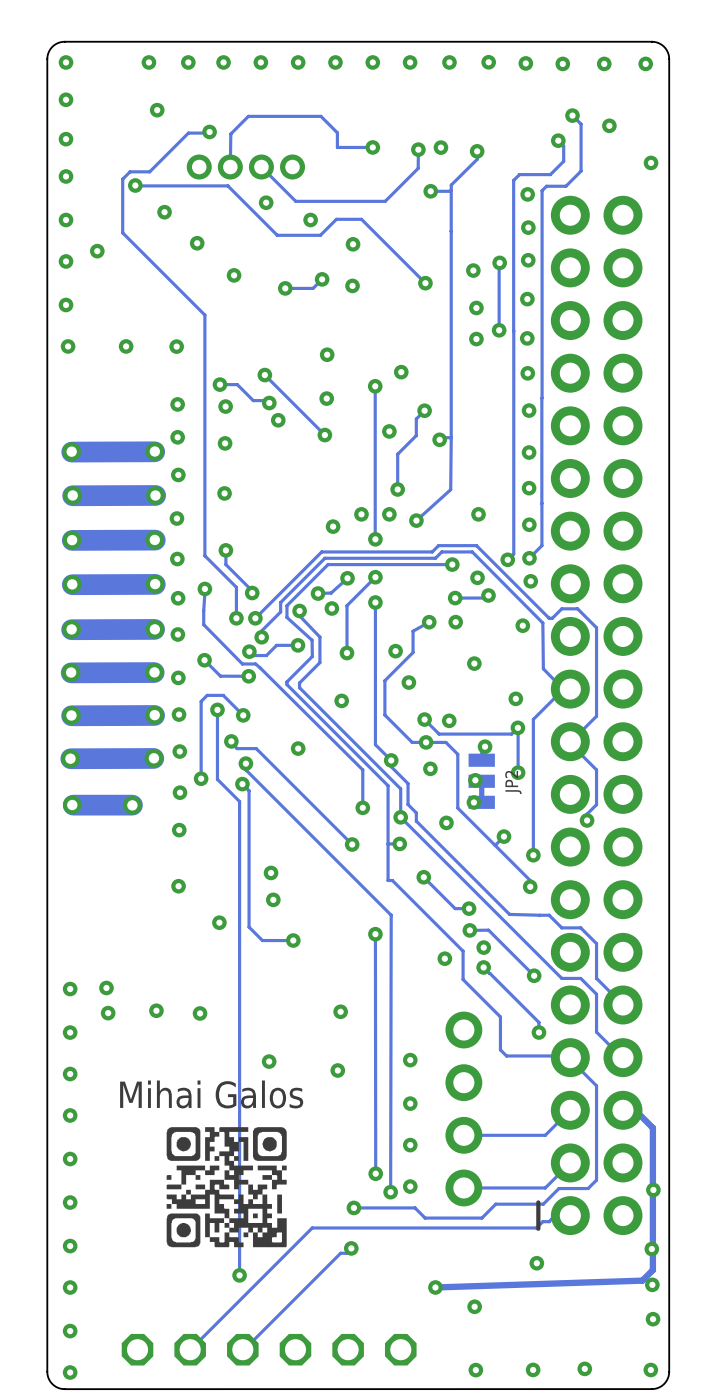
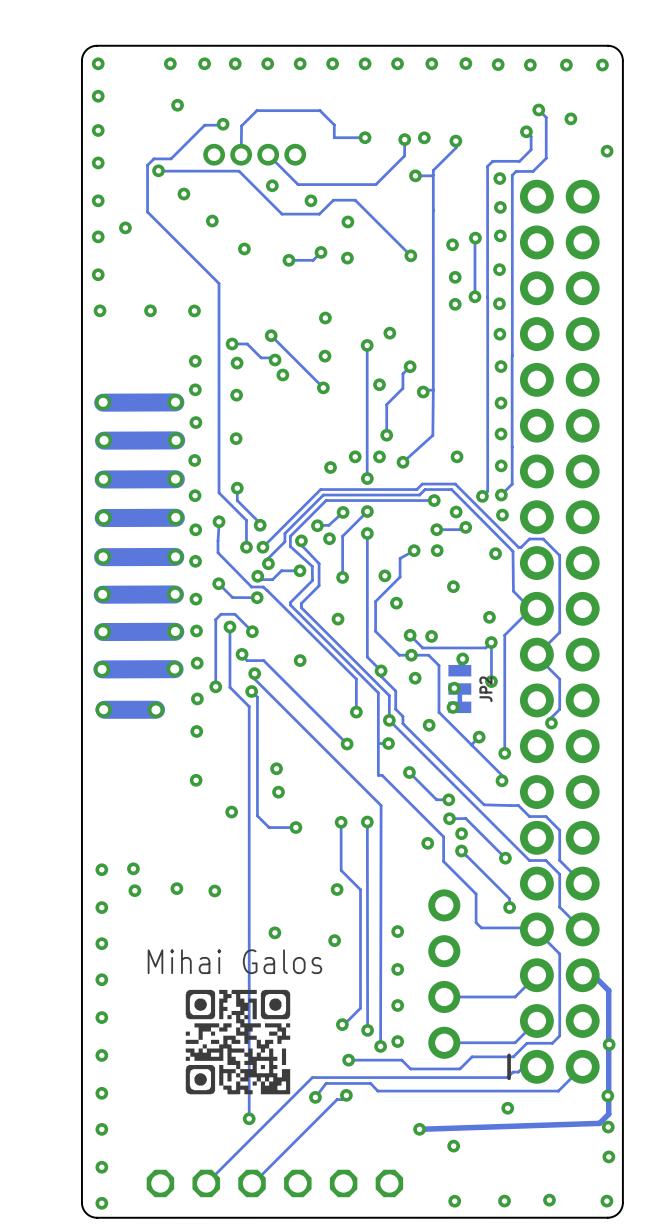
track: none -> (341, 822) (341, 870) (360, 889) (360, 1008) (342, 1024)
via: none -> (341, 822)
via: none -> (342, 1024)
track: none -> (582, 1066) (558, 1090)
track: none -> (558, 1091) (377, 1091) (370, 1083) (326, 1083) (315, 1097)
via: none -> (315, 1097)

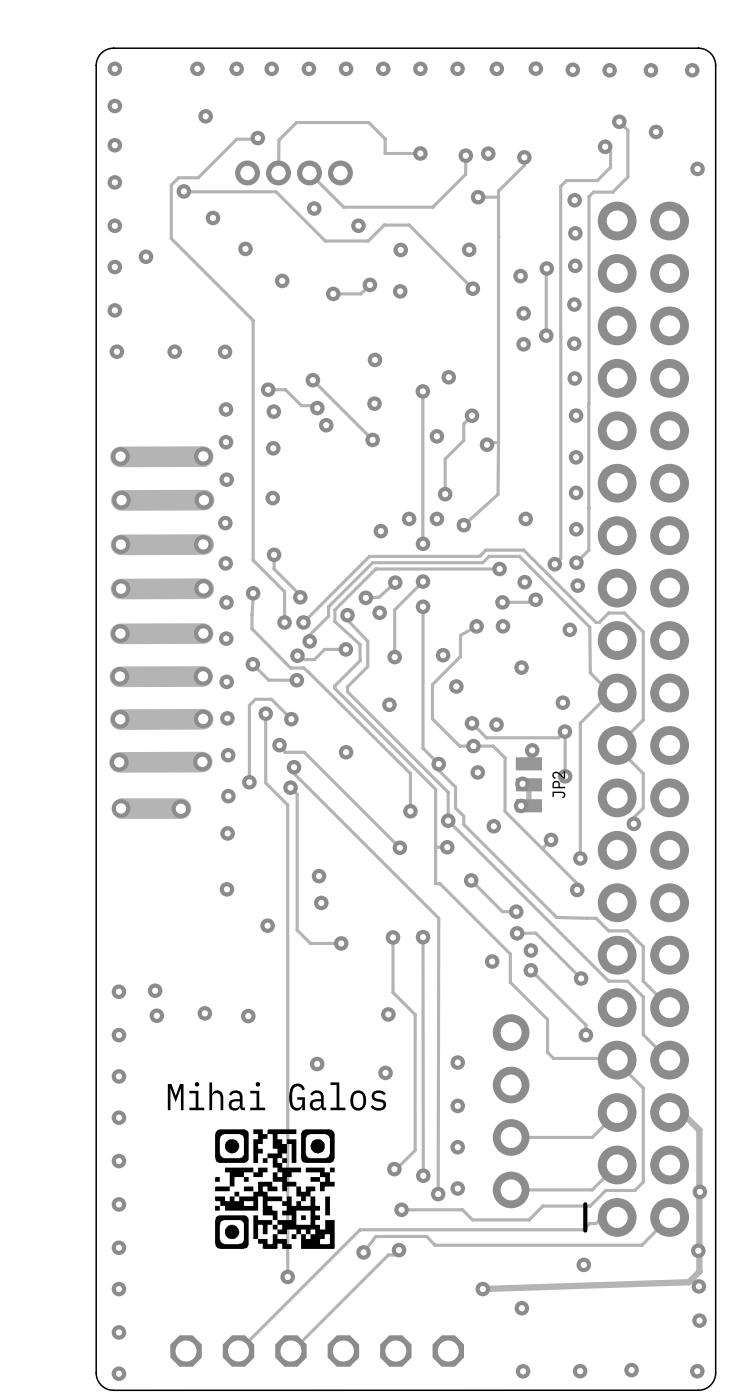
via: none -> (469, 249)

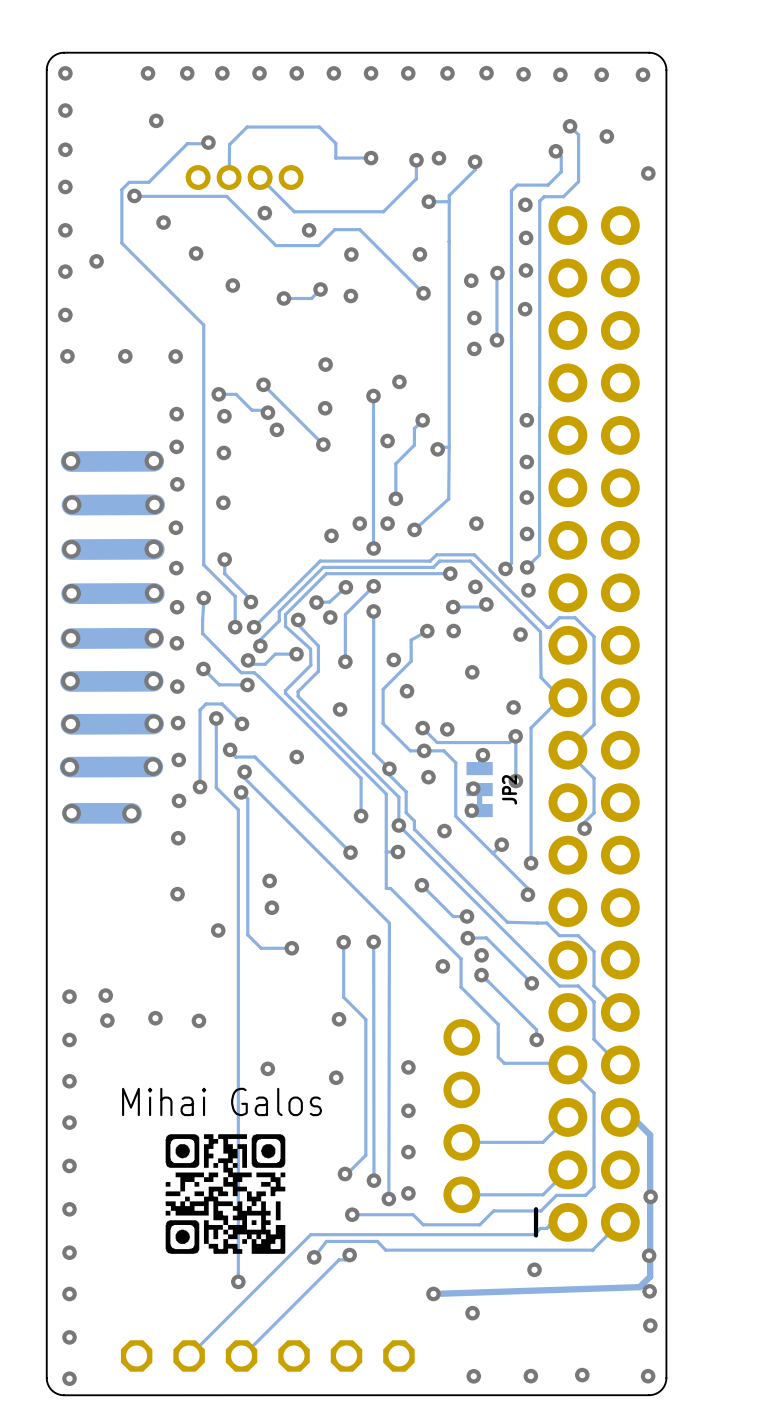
via: (574, 343) -> none
via: (574, 378) -> none

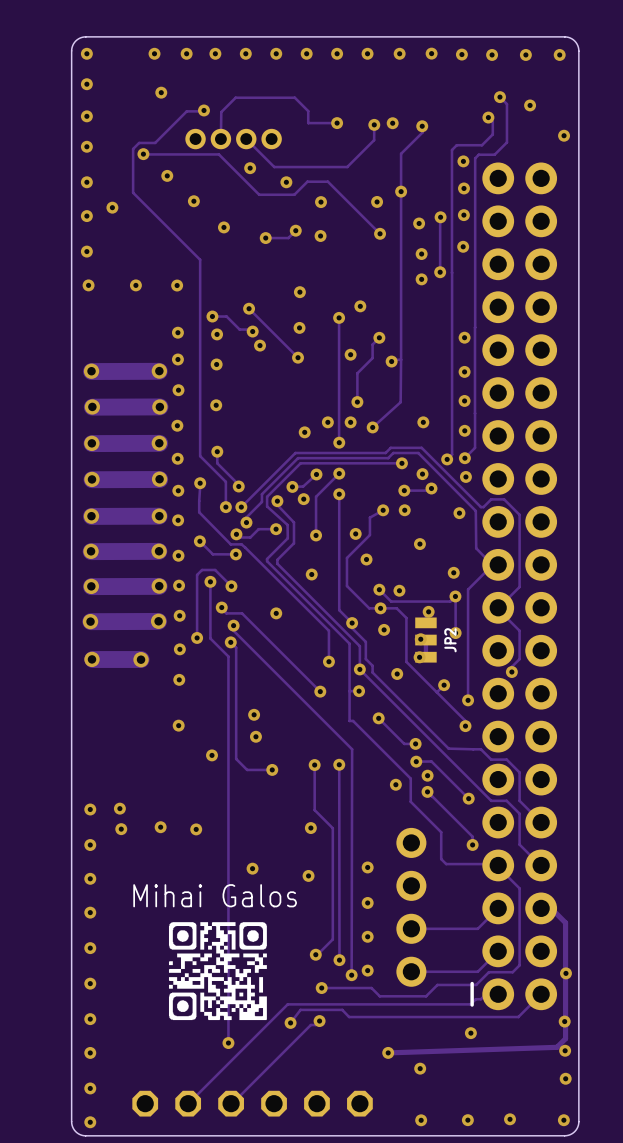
track: (449, 200) (428, 201) -> none
via position: (428, 201) -> (401, 191)

